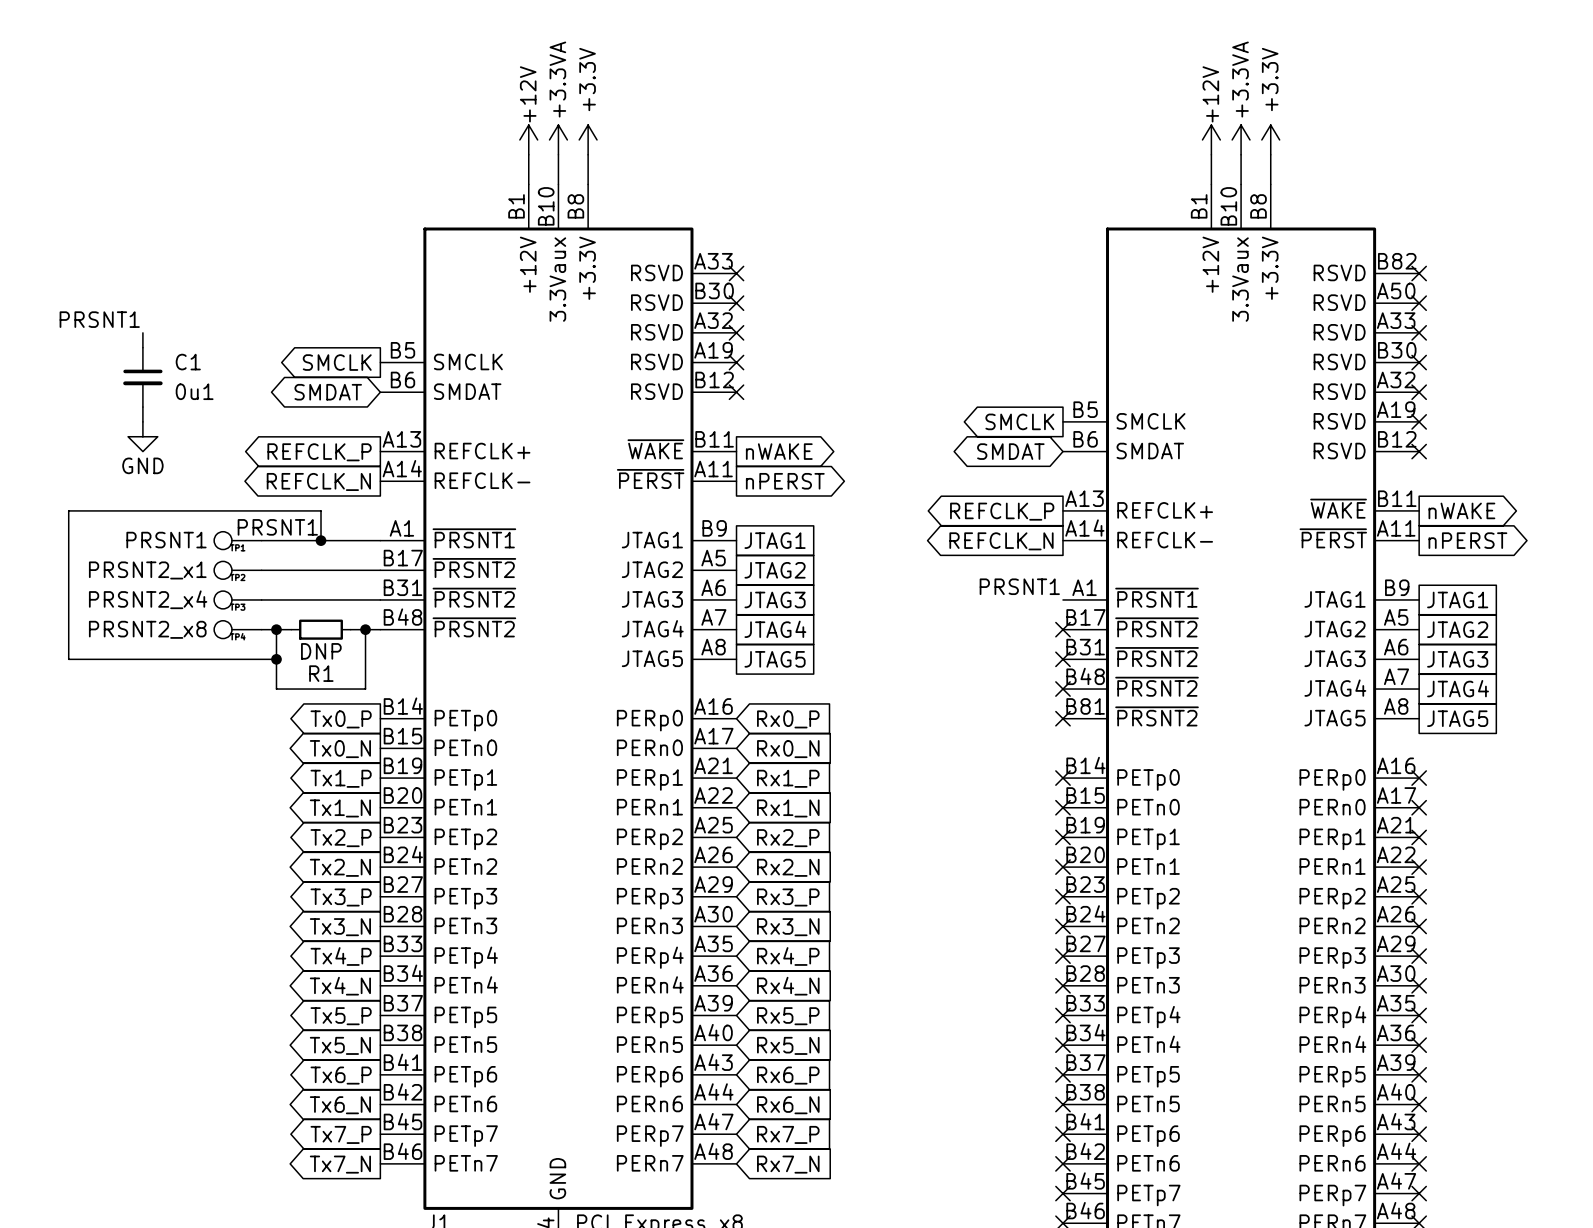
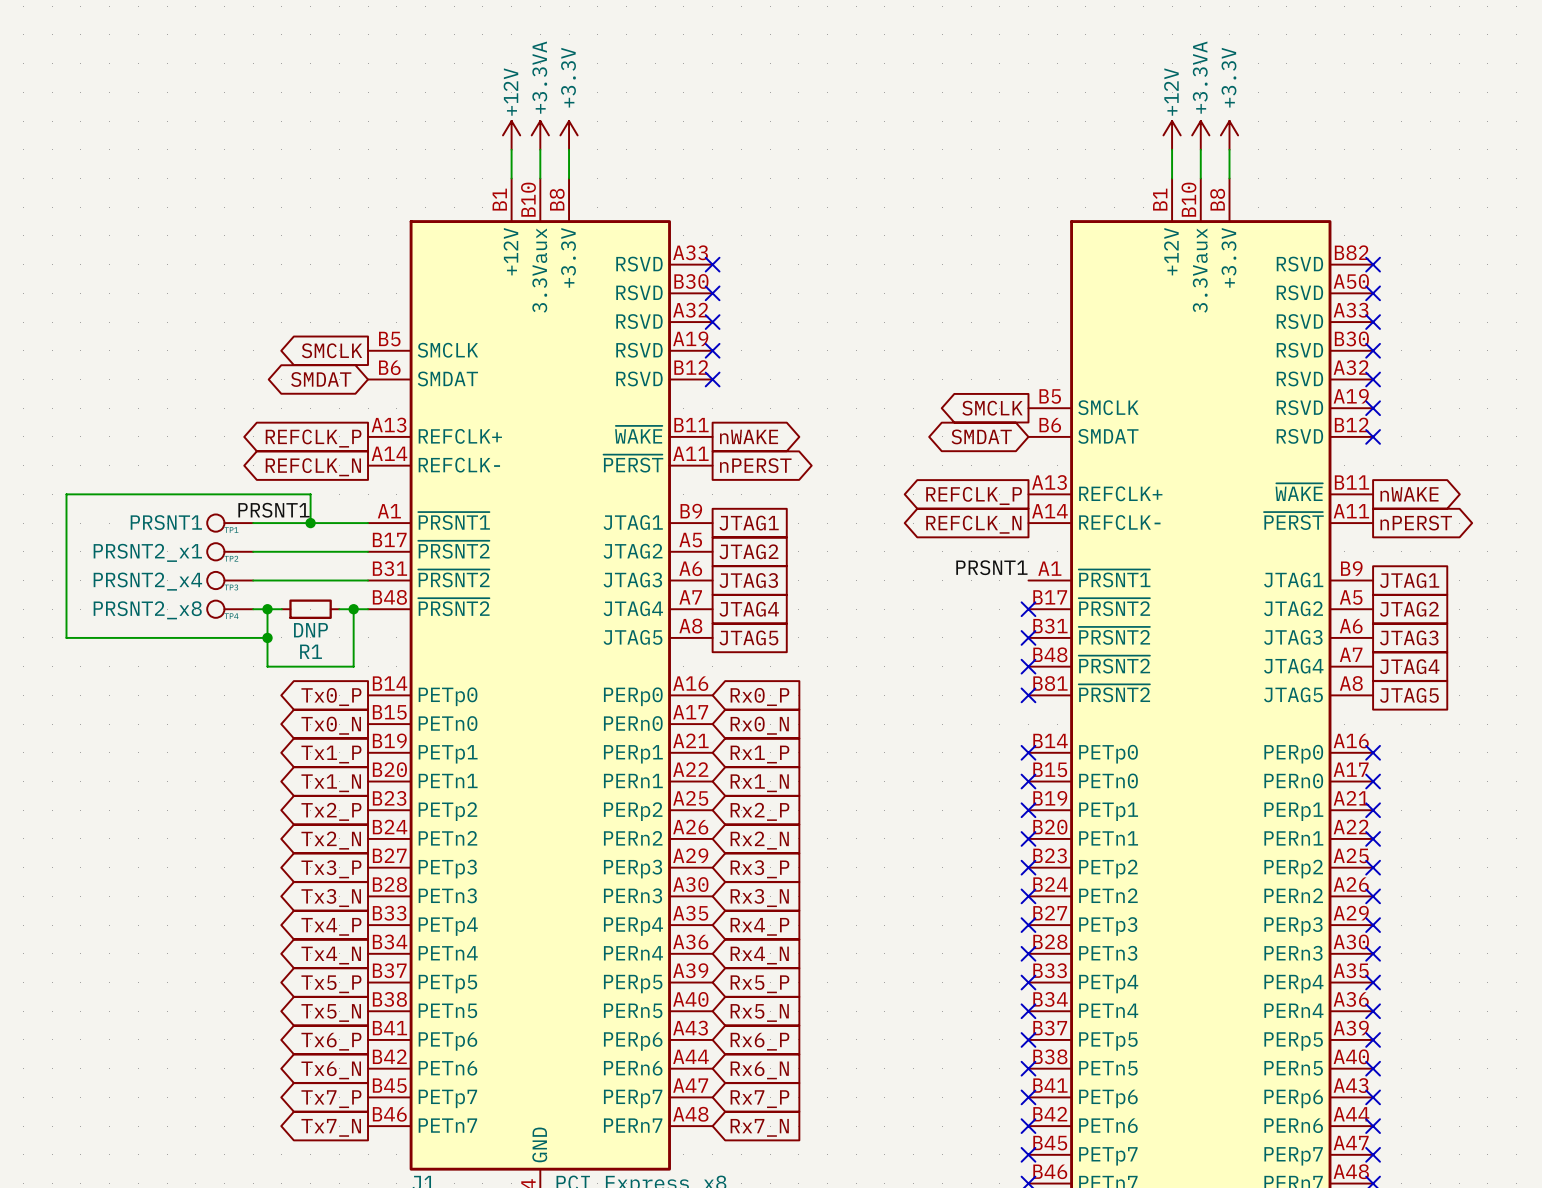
label: PRSNT1 (99, 319) -> none
wire: (142, 332) (142, 347) -> none
C1: 0u1 (142, 377) -> none
wire: (142, 407) (142, 421) -> none
power symbol: GND (142, 436) -> none

